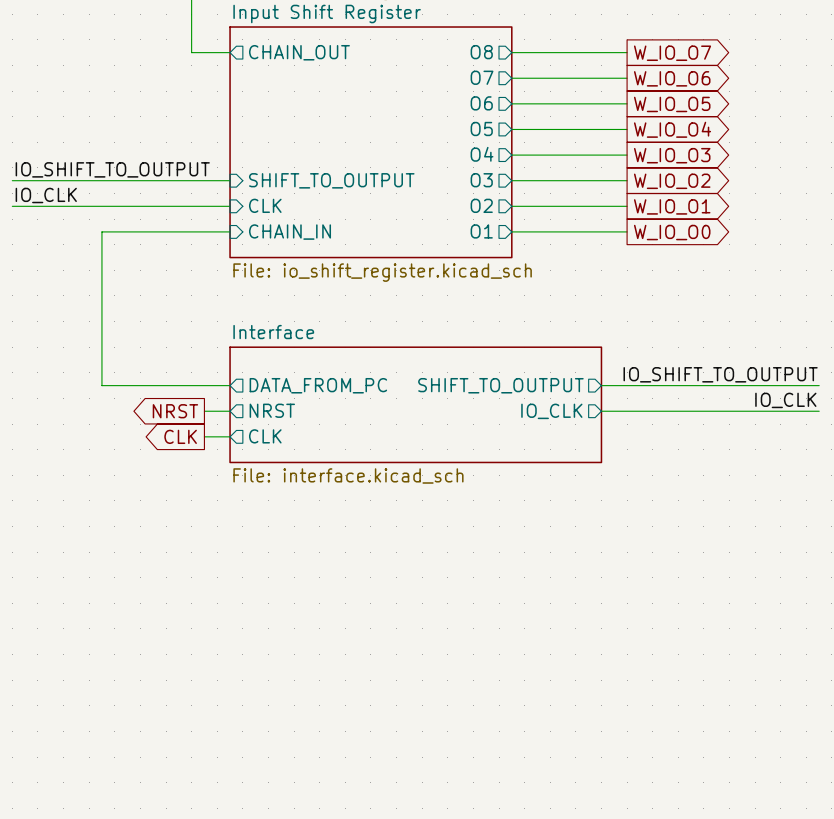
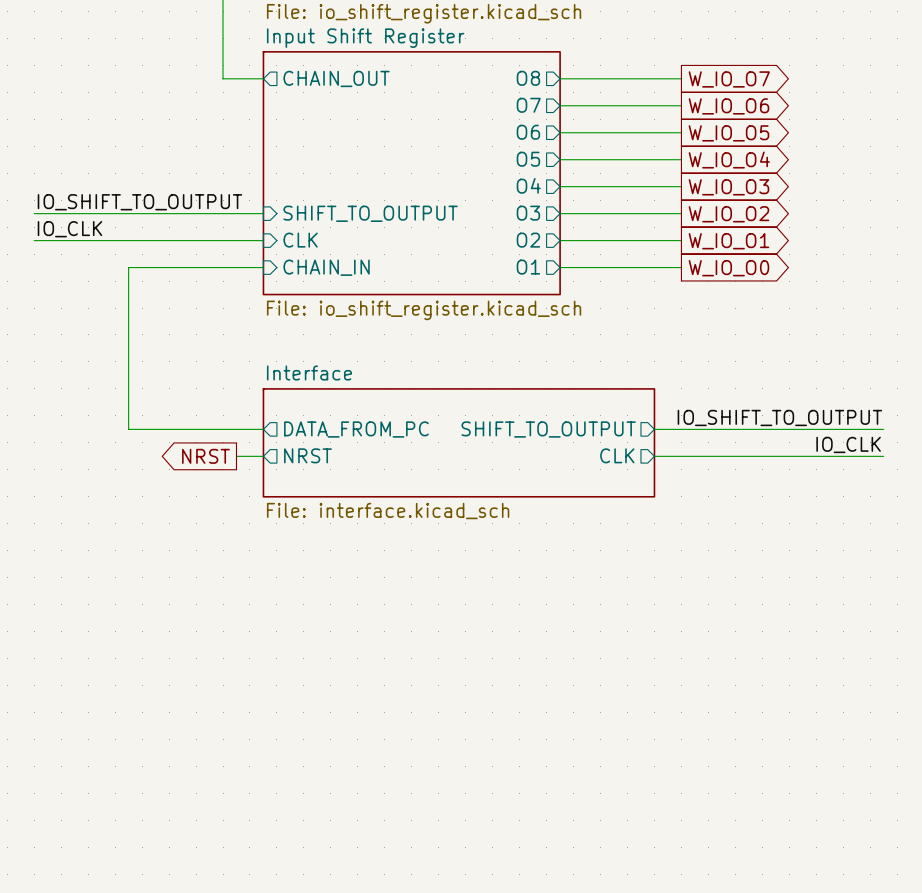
sheet Interface shape: [229, 346, 603, 464] -> [262, 388, 656, 498]
sheet pin: IO_CLK (551, 411) -> CLK (617, 455)
global label: CLK (180, 436) -> none
wire: (204, 436) (230, 436) -> none
sheet pin: CLK (265, 436) -> none

